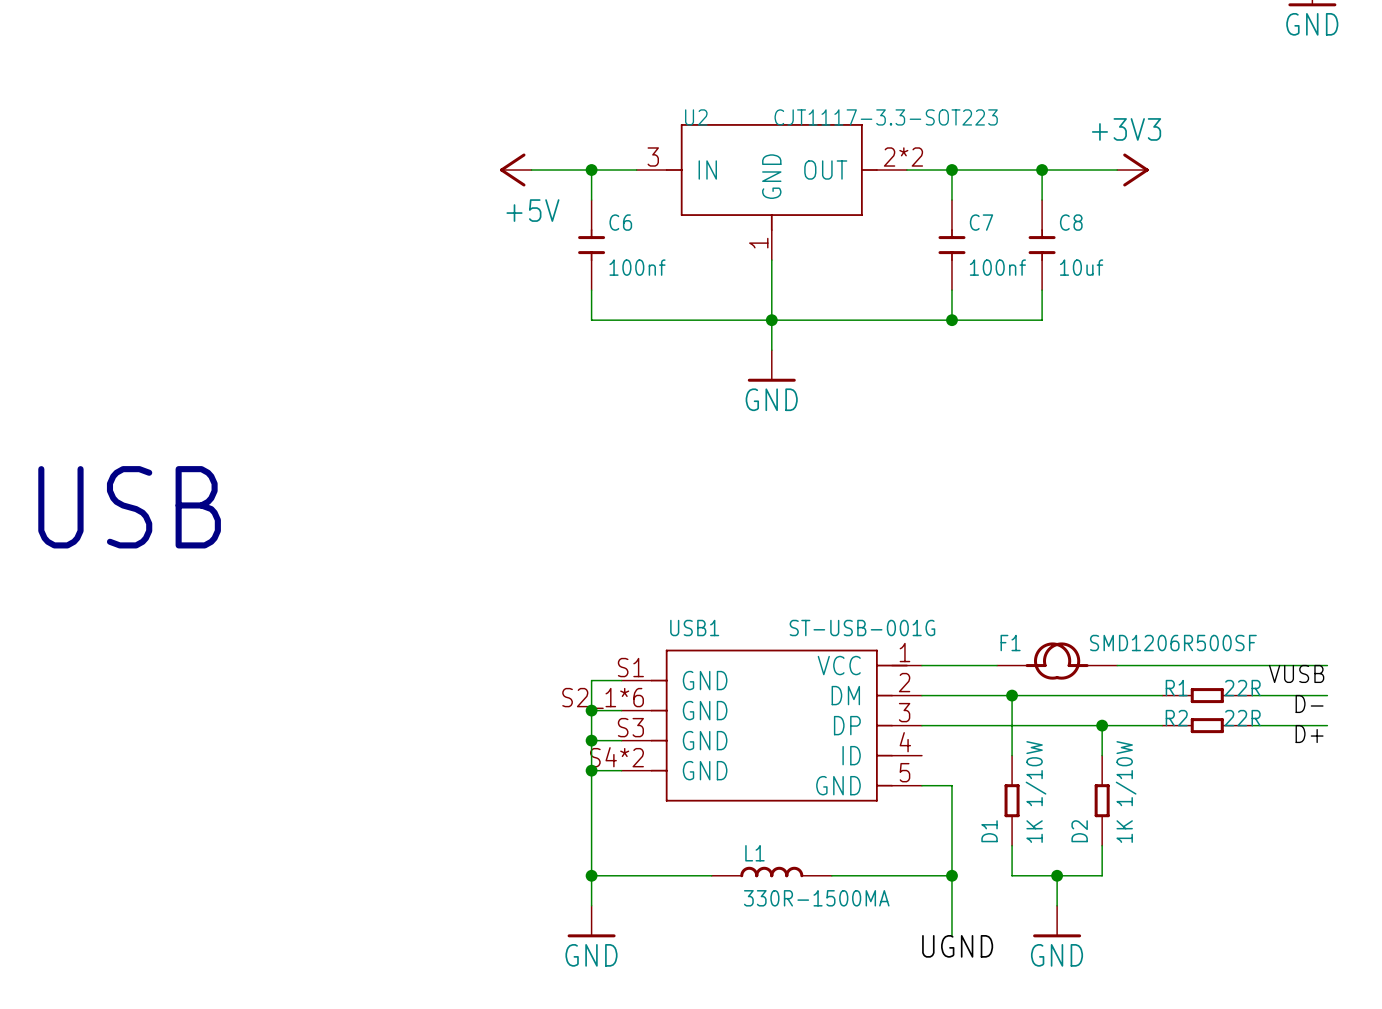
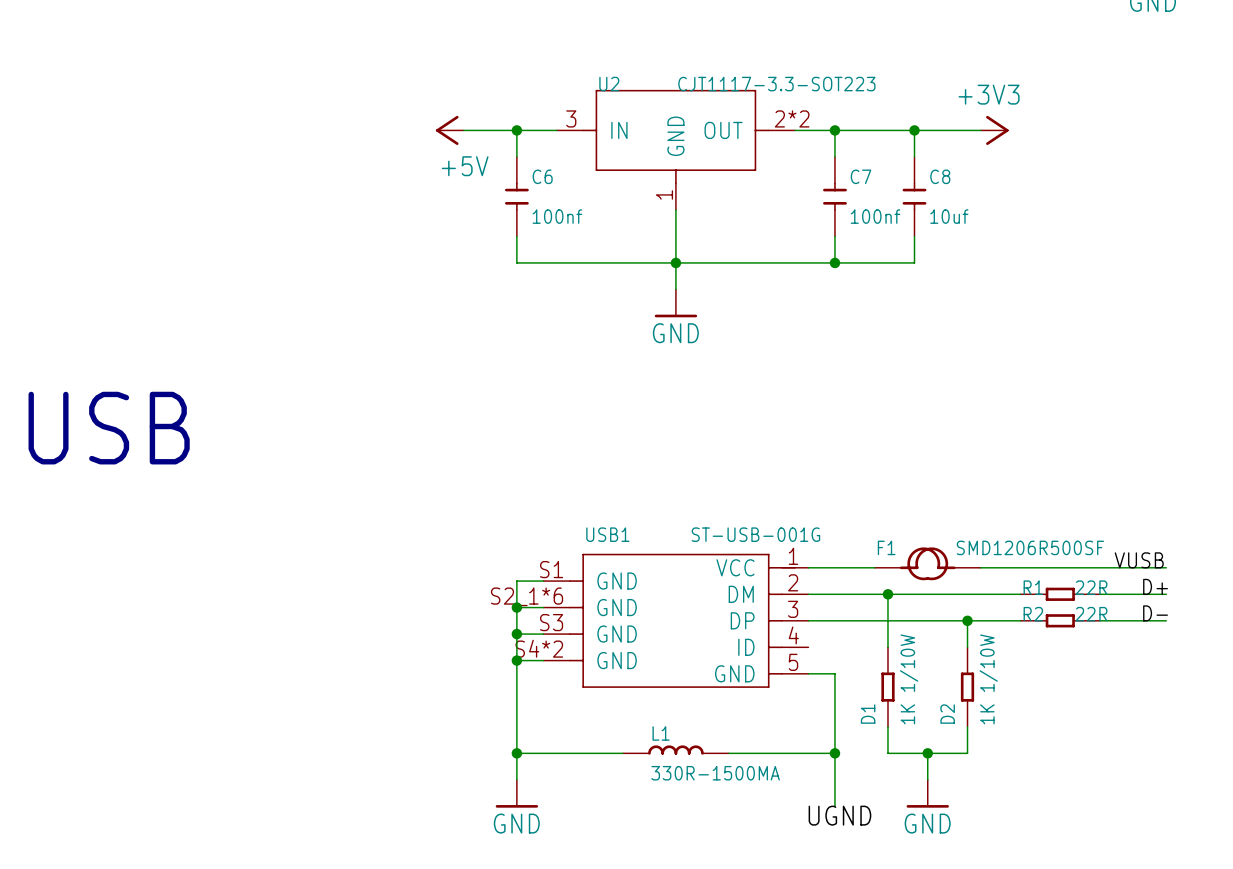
label position: VUSB (1296, 673) -> VUSB (1139, 560)
label position: D- (1309, 703) -> D- (1155, 613)
label position: D+ (1309, 734) -> D+ (1155, 586)

